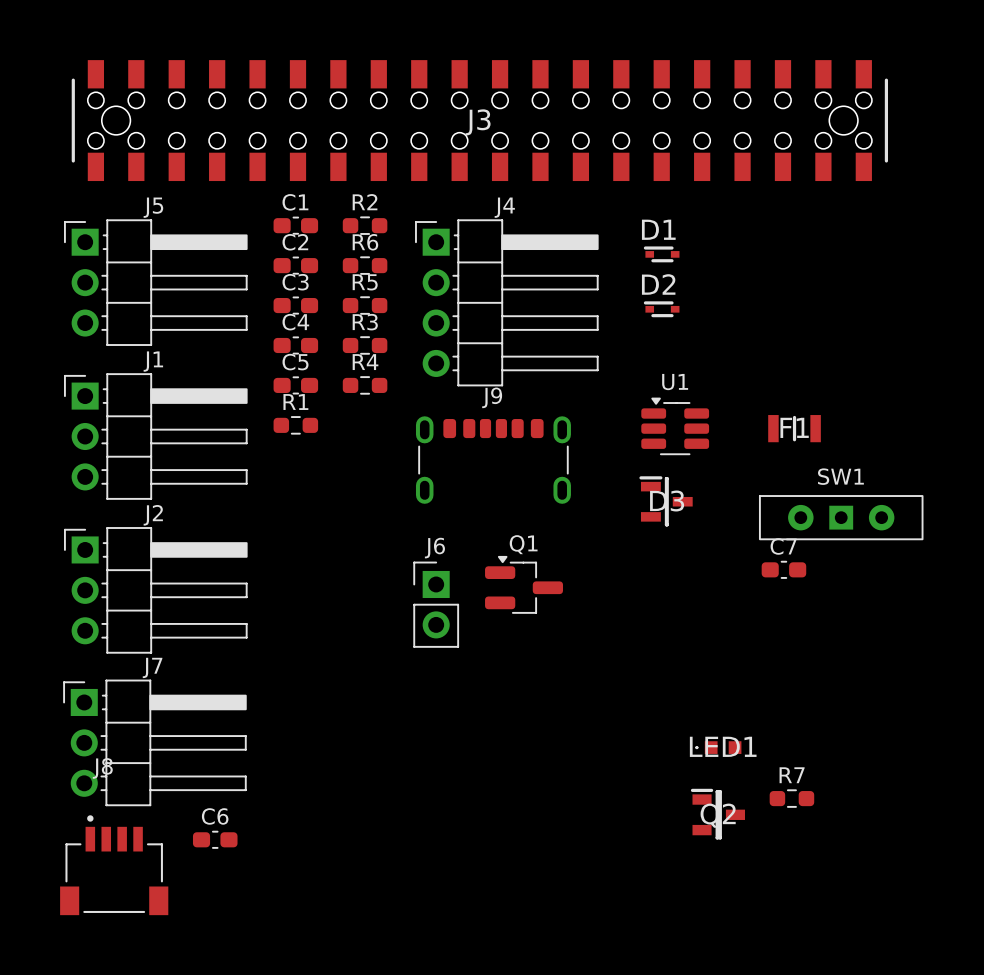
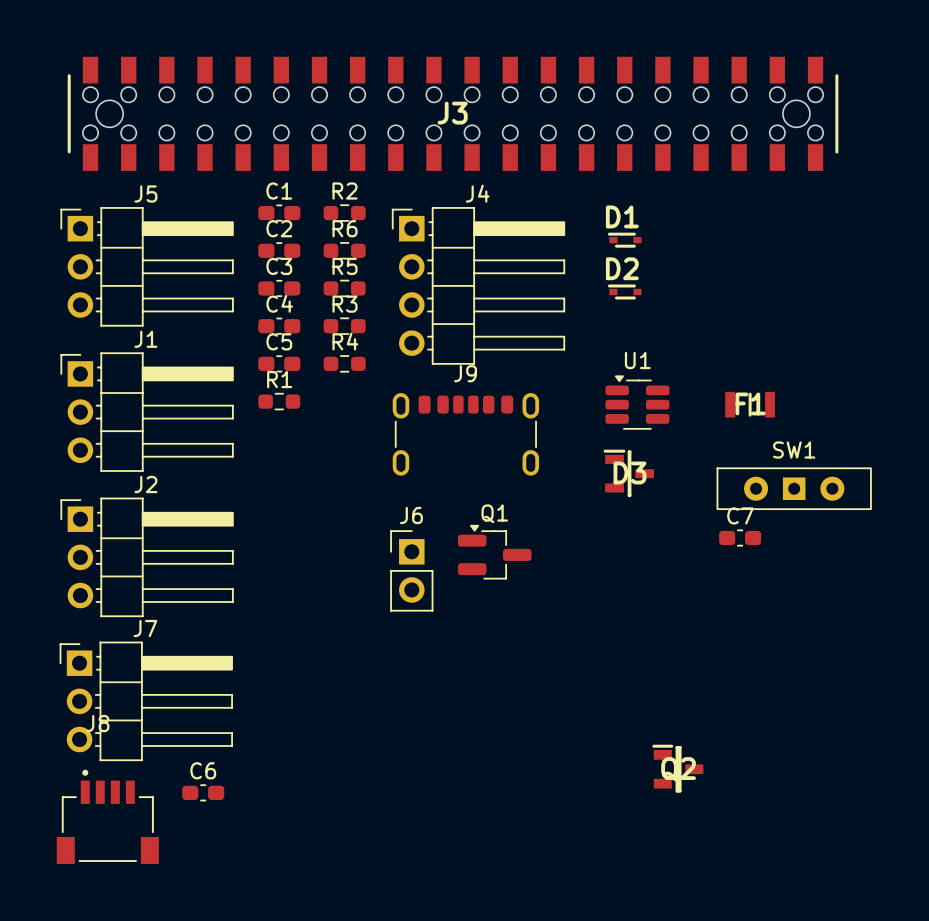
LED1: (718, 747) -> none
R7: (791, 798) -> none

